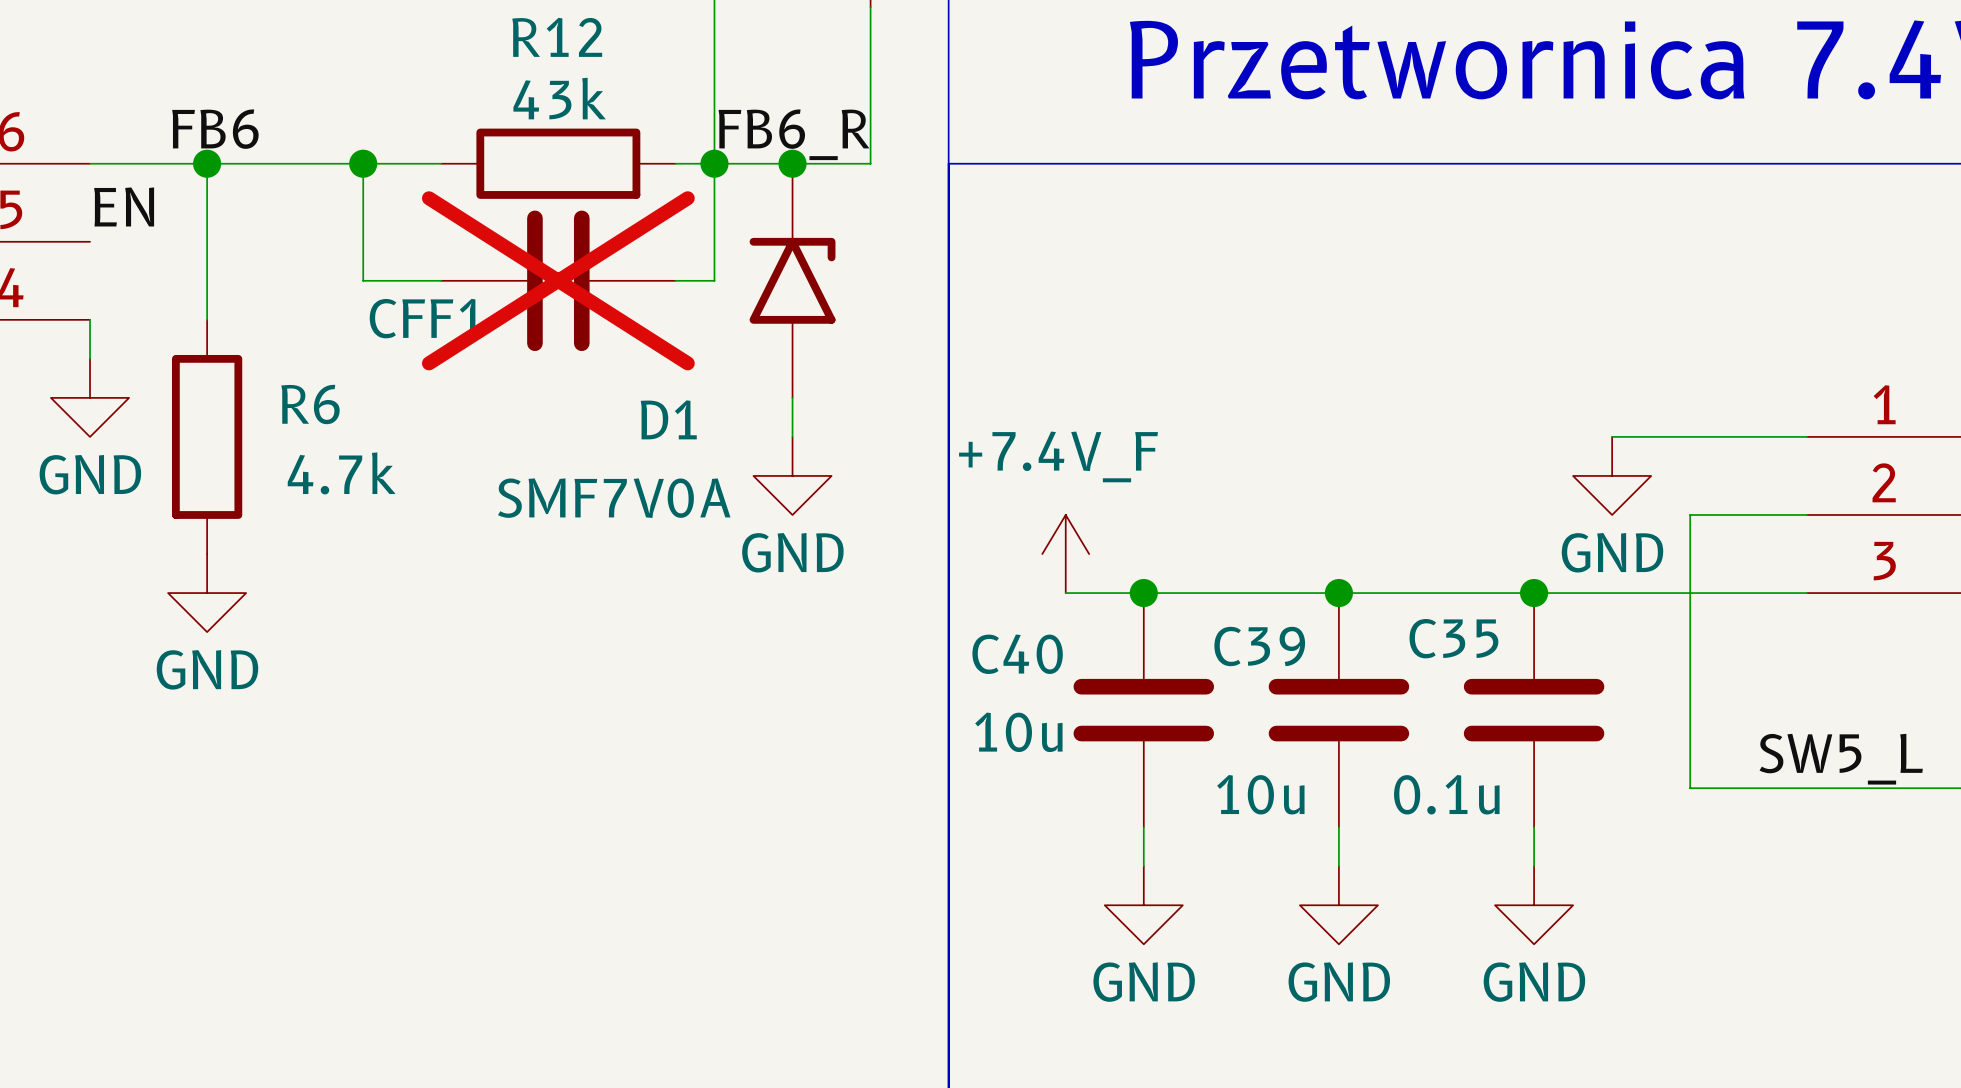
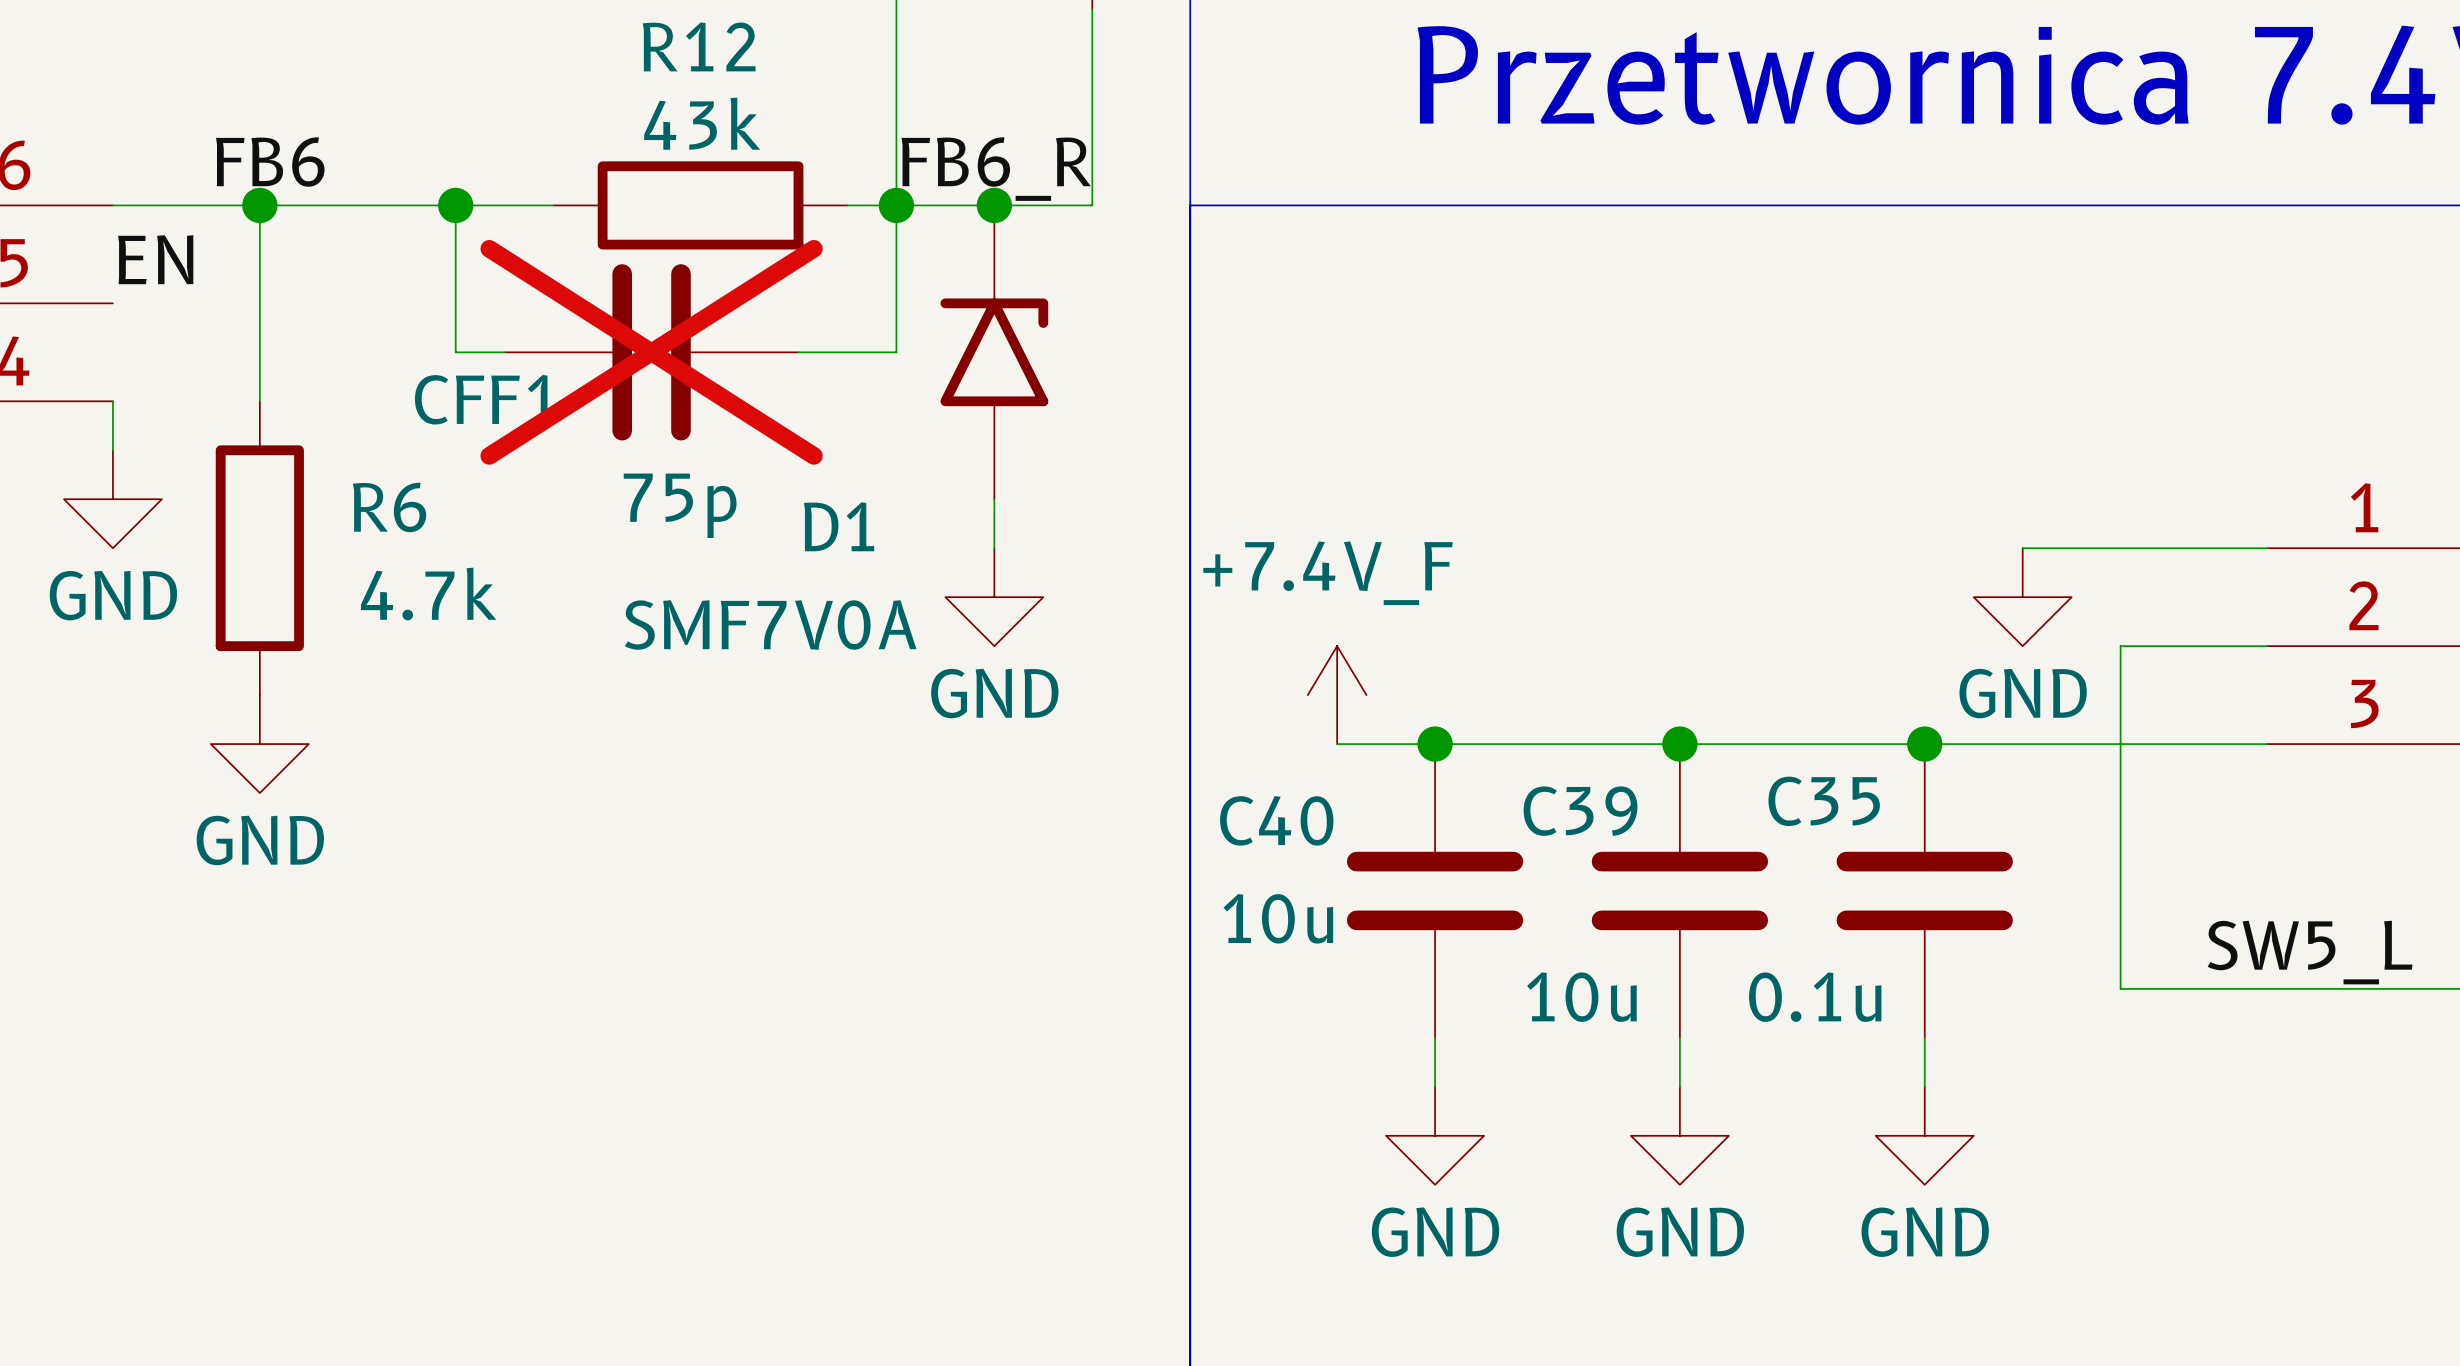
CFF1 position: (558, 280) -> (651, 352)
CFF1 value: none -> 75p (680, 505)

